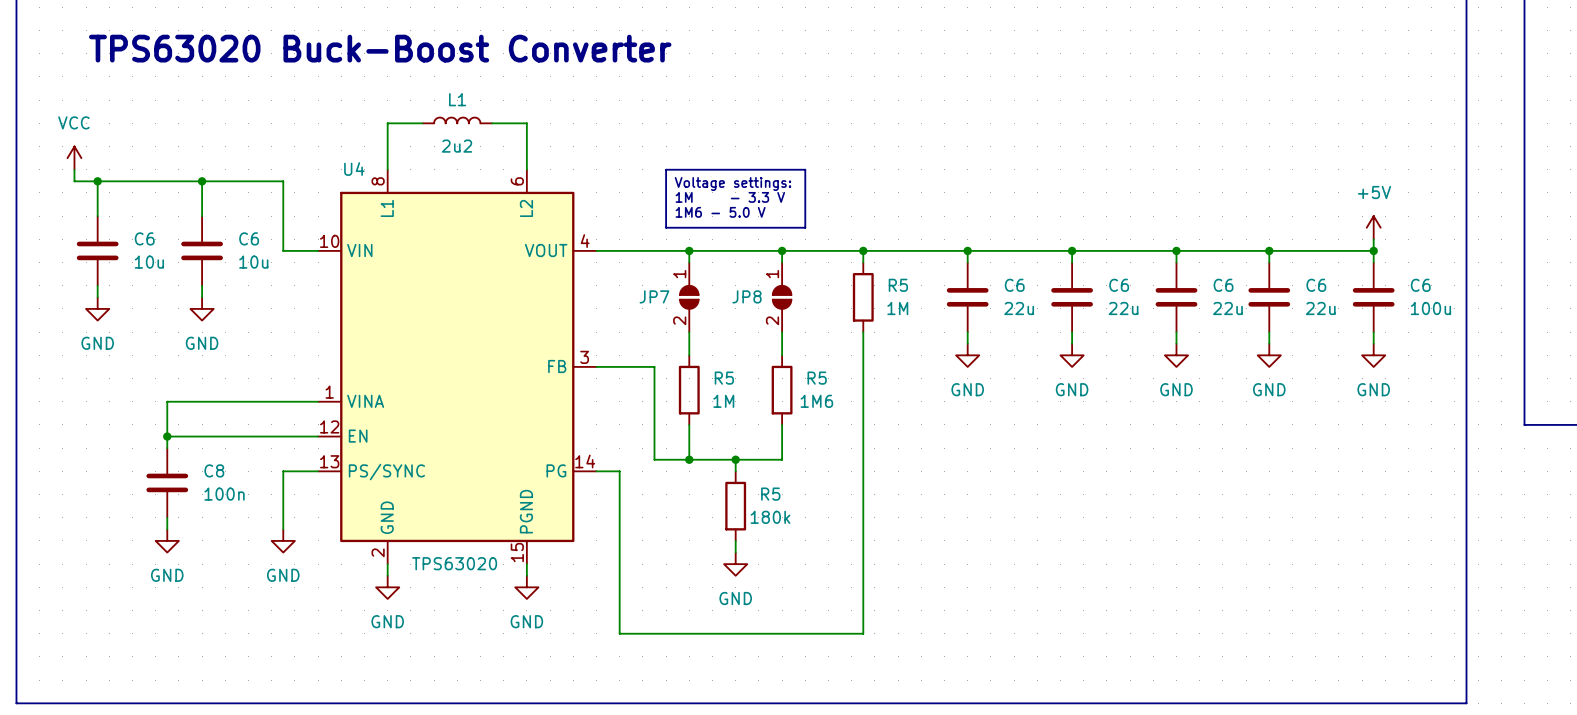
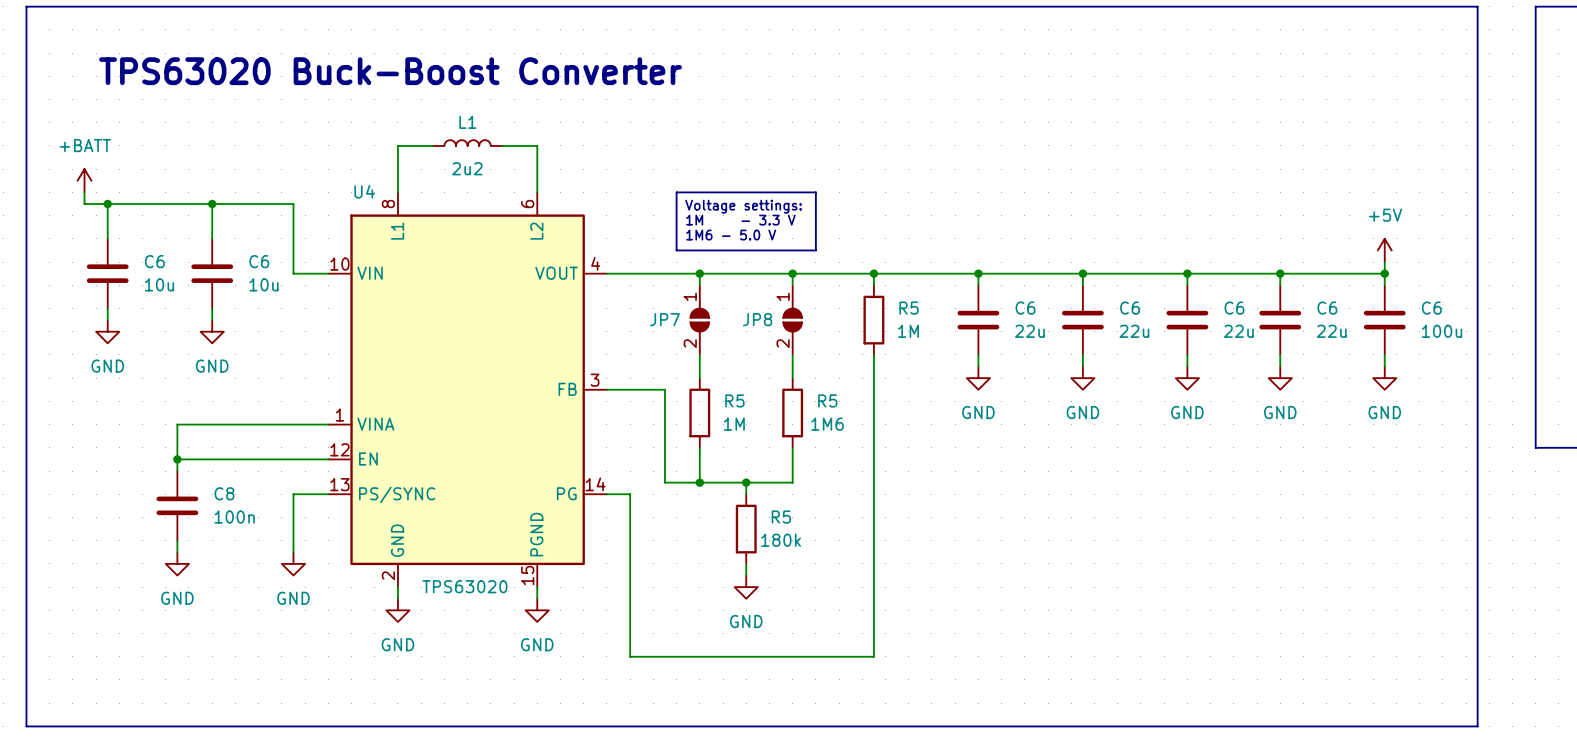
power symbol: VCC (74, 158) -> +BATT (84, 180)

